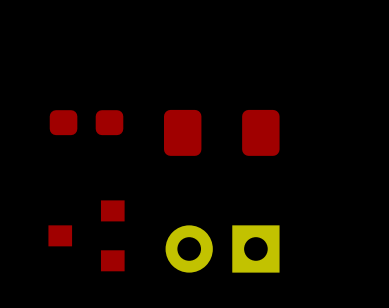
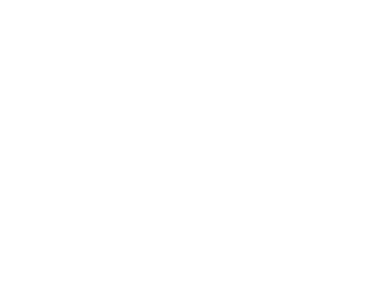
part: (86, 122) -> none
part: (221, 132) -> none
part: (86, 235) -> none
part: (222, 248) -> none

